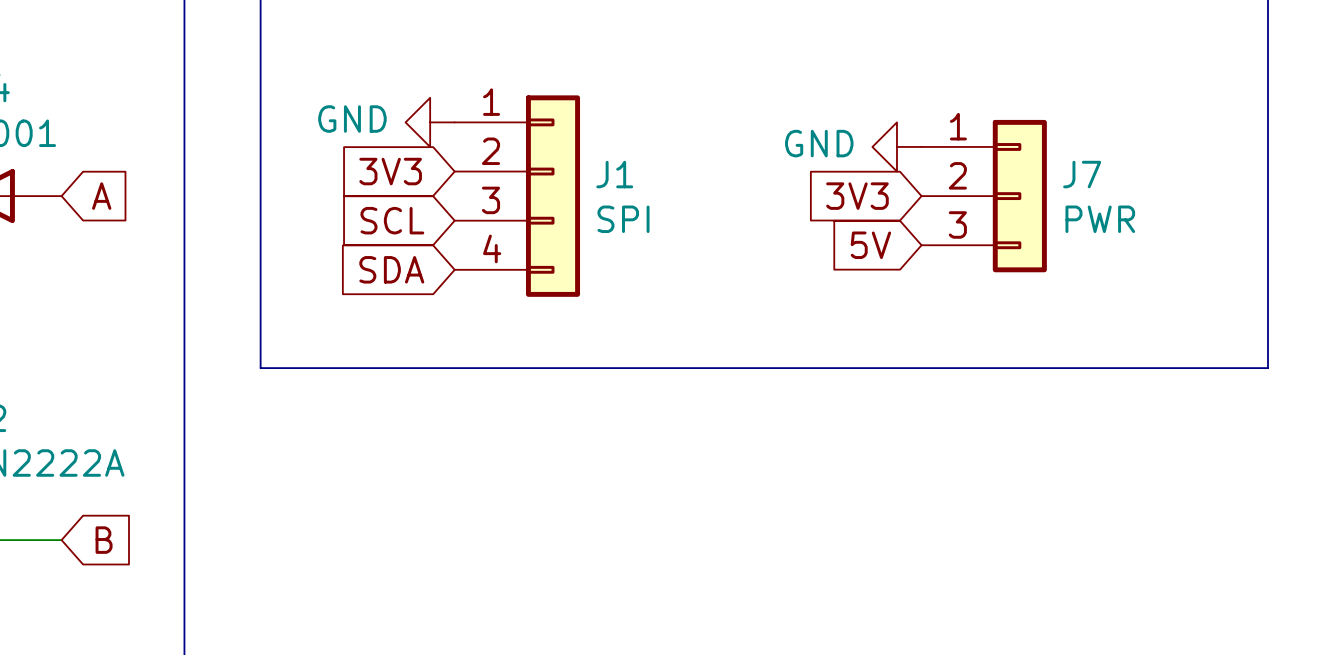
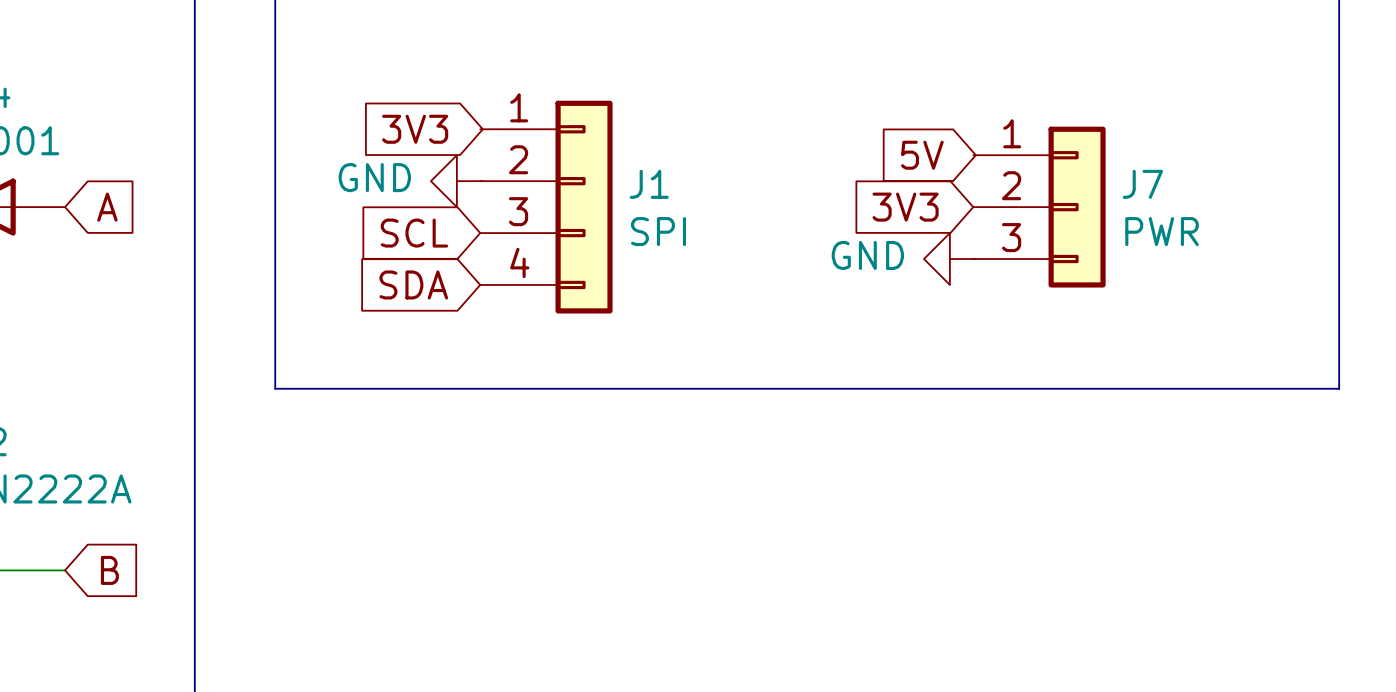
power symbol position: GND (430, 122) -> GND (456, 181)
power symbol position: GND (896, 146) -> GND (949, 259)
global label position: 3V3 (390, 171) -> 3V3 (415, 129)
global label position: 5V (870, 245) -> 5V (922, 155)

